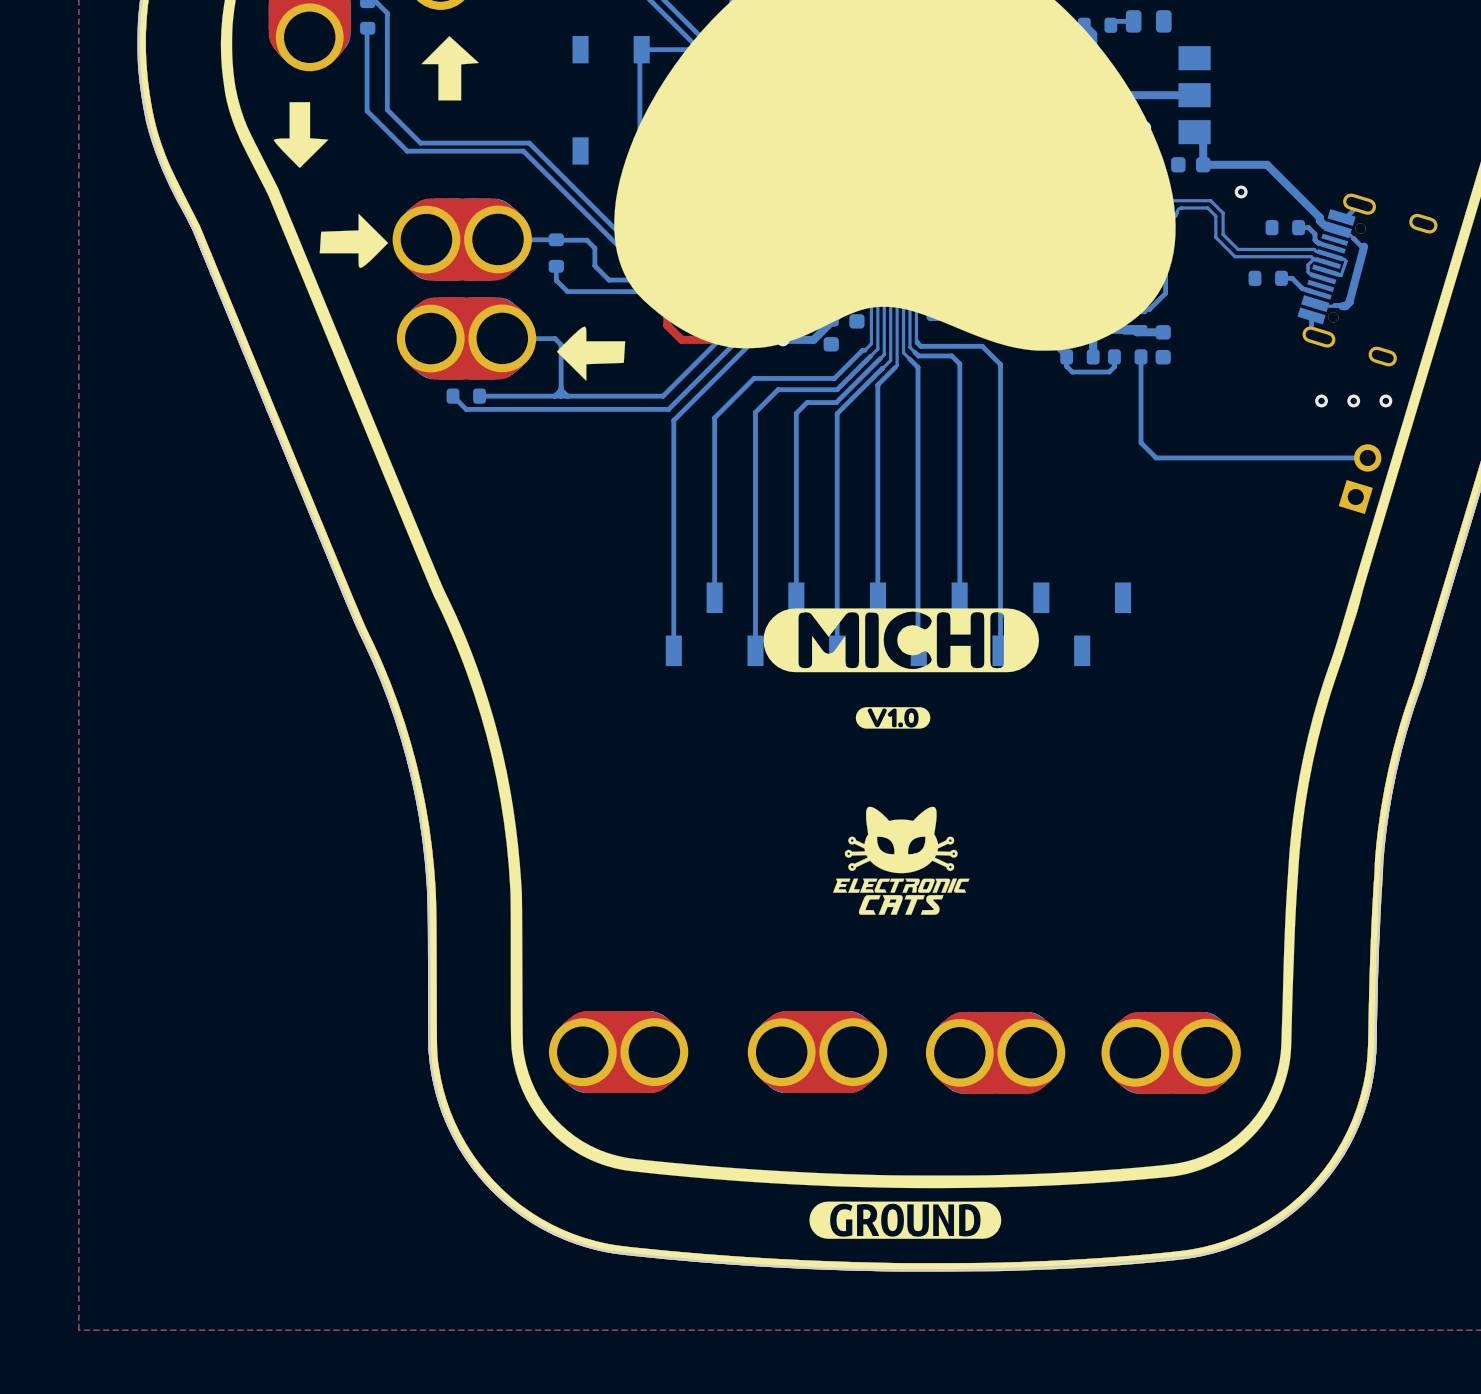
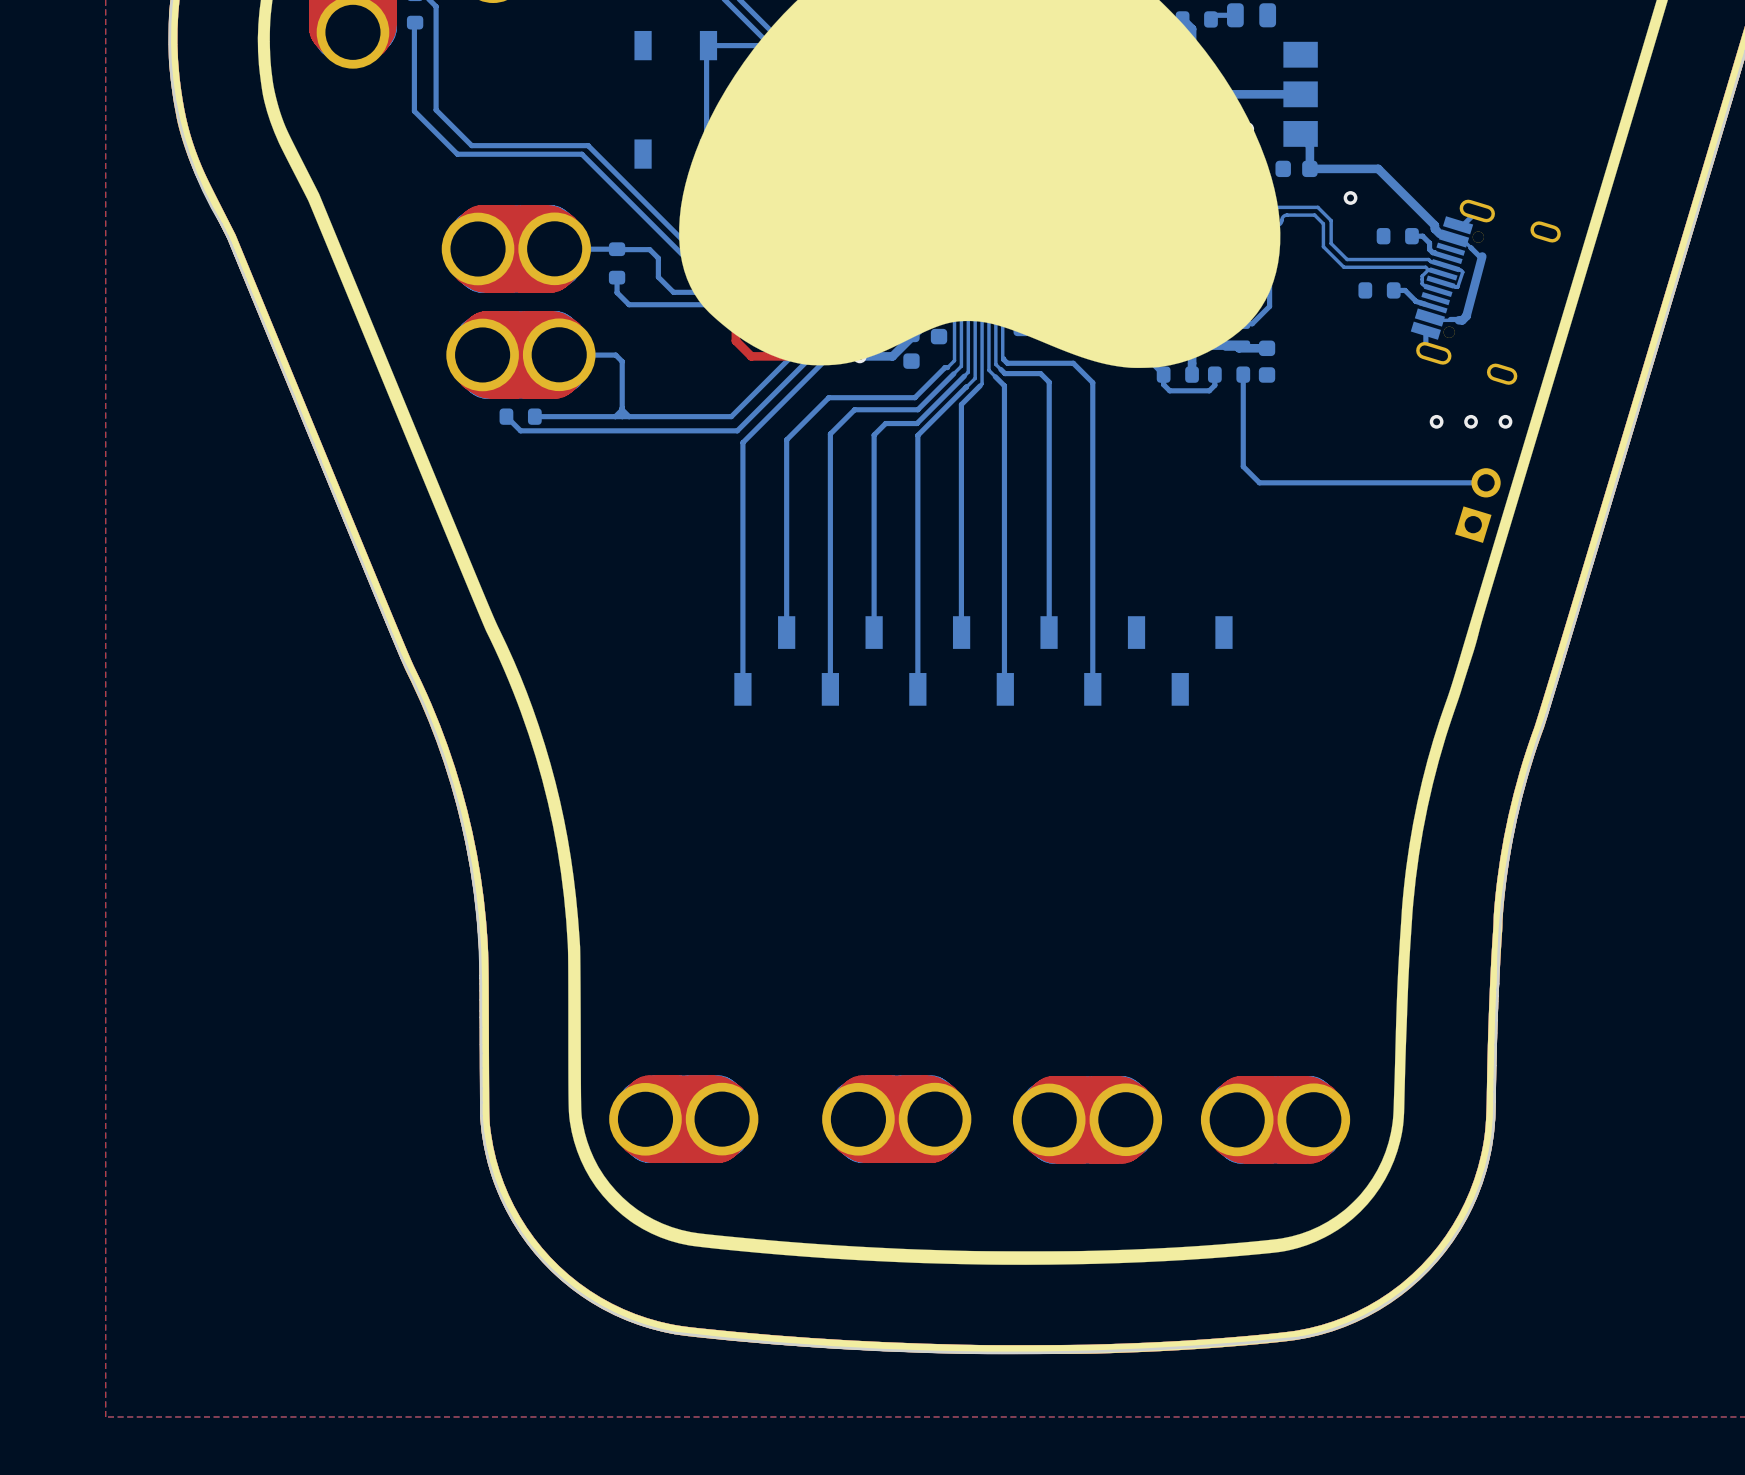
drawing: [421, 36, 479, 101] -> none
drawing: [273, 102, 329, 169] -> none
drawing: [319, 213, 389, 269] -> none
drawing: [556, 326, 626, 381] -> none
drawing: [763, 608, 1040, 673] -> none
drawing: [855, 707, 931, 729] -> none
drawing: [833, 806, 970, 915] -> none
drawing: [809, 1201, 1002, 1239] -> none

